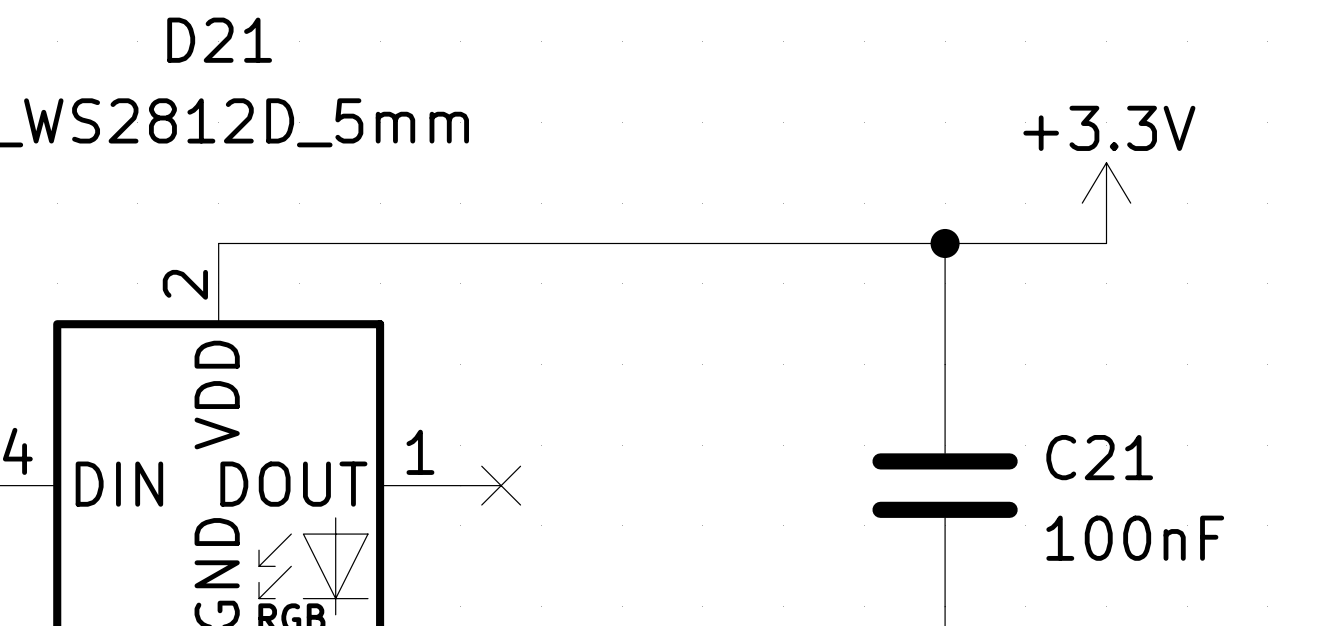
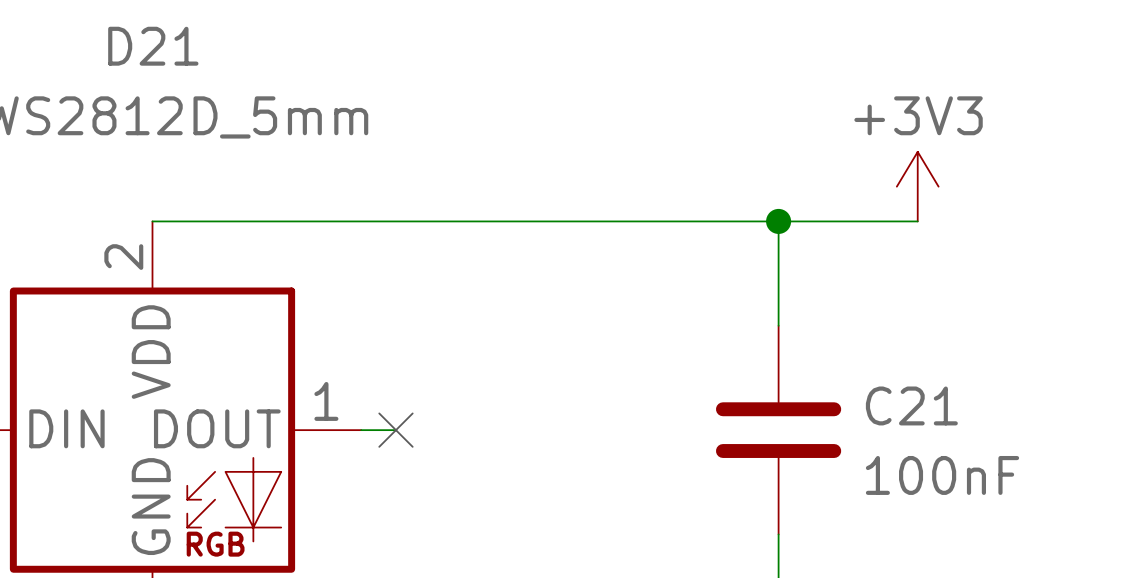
power symbol: +3.3V (1106, 203) -> +3V3 (917, 186)

